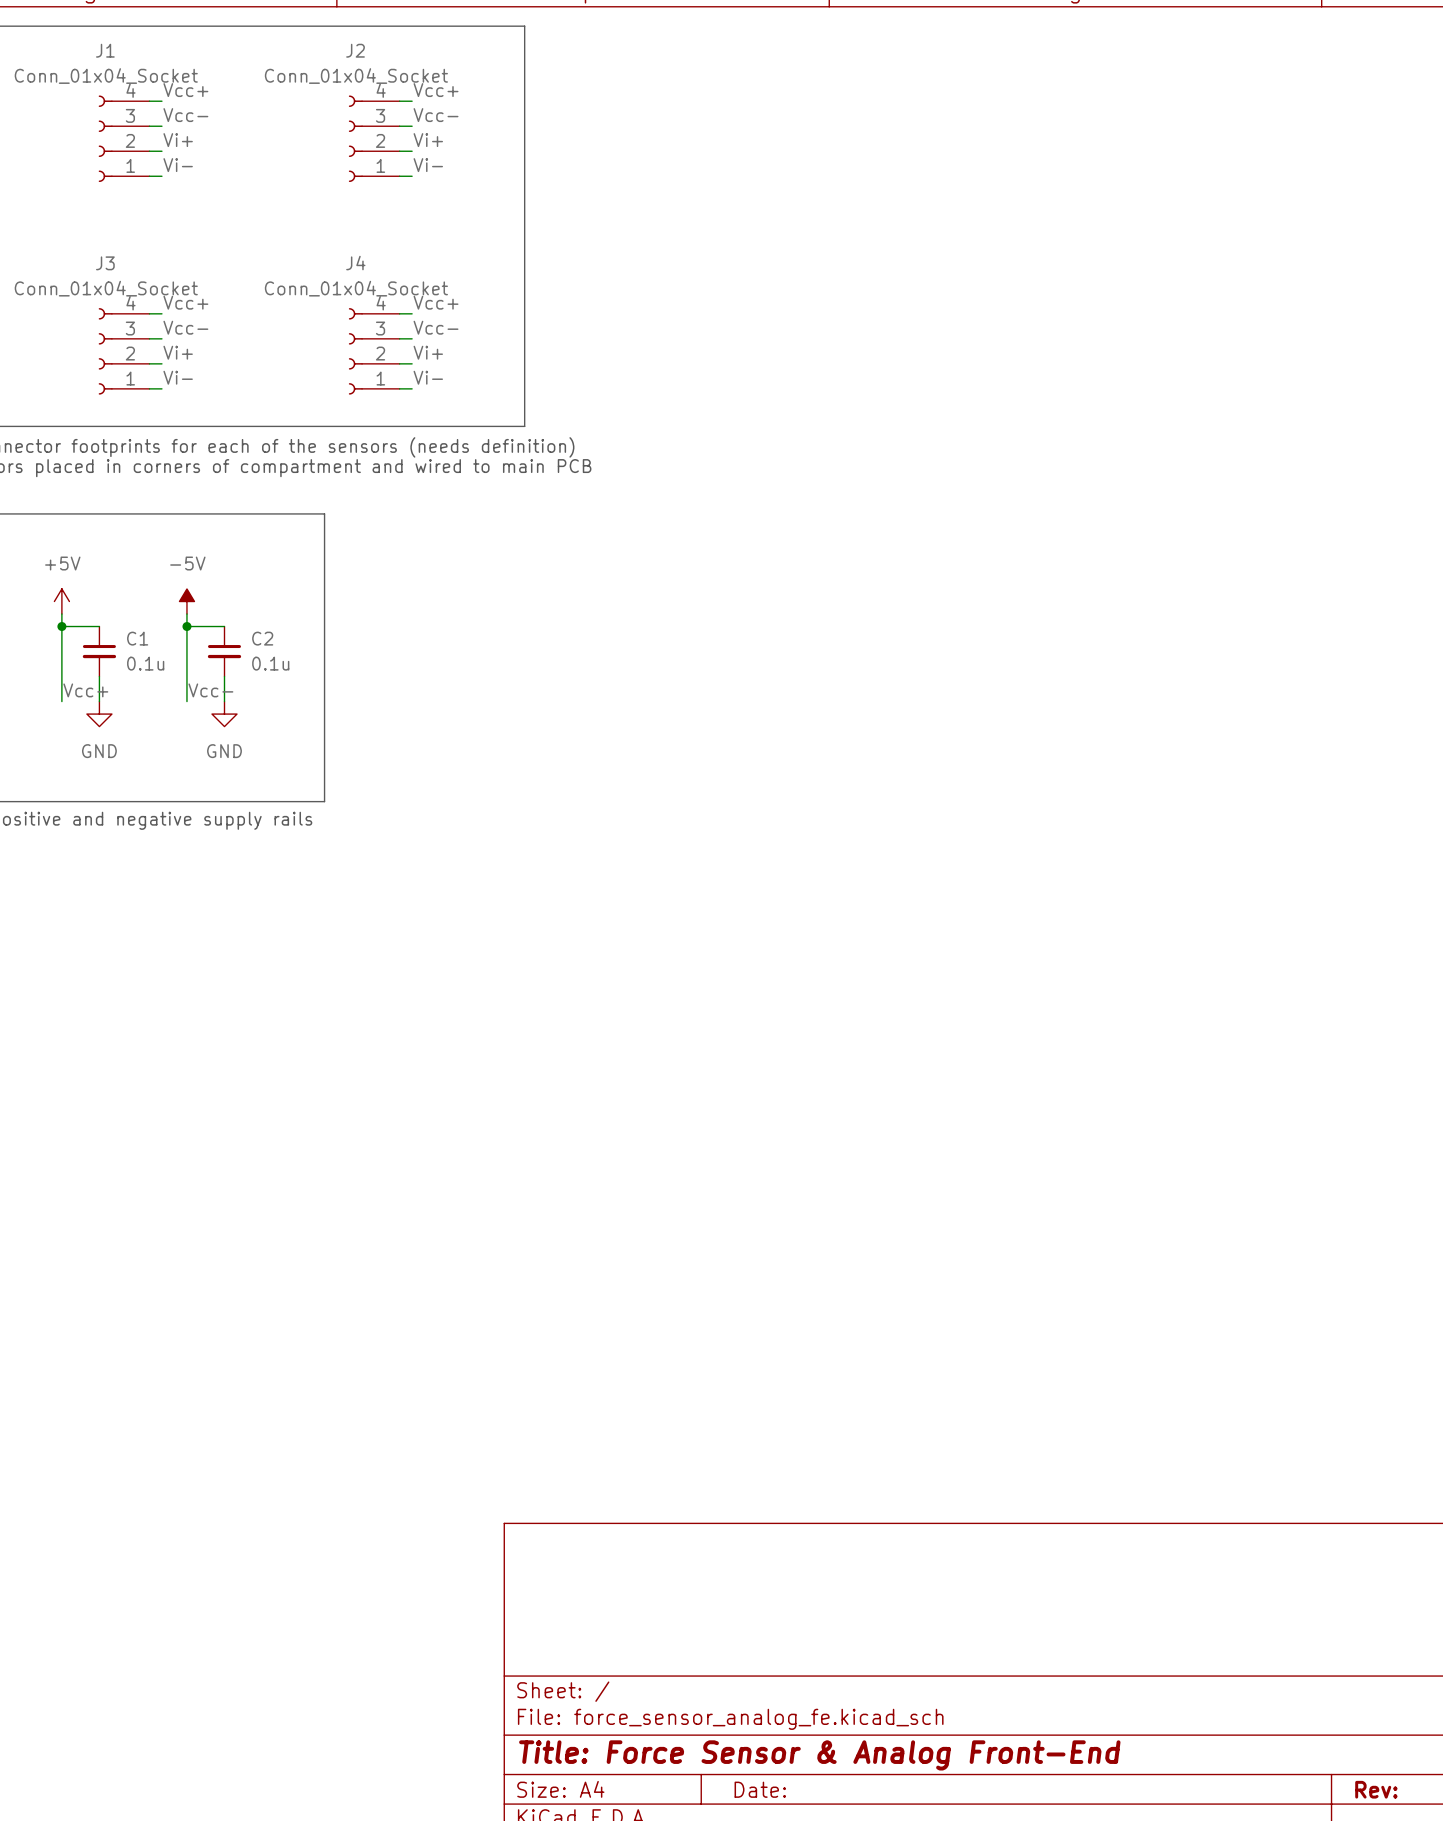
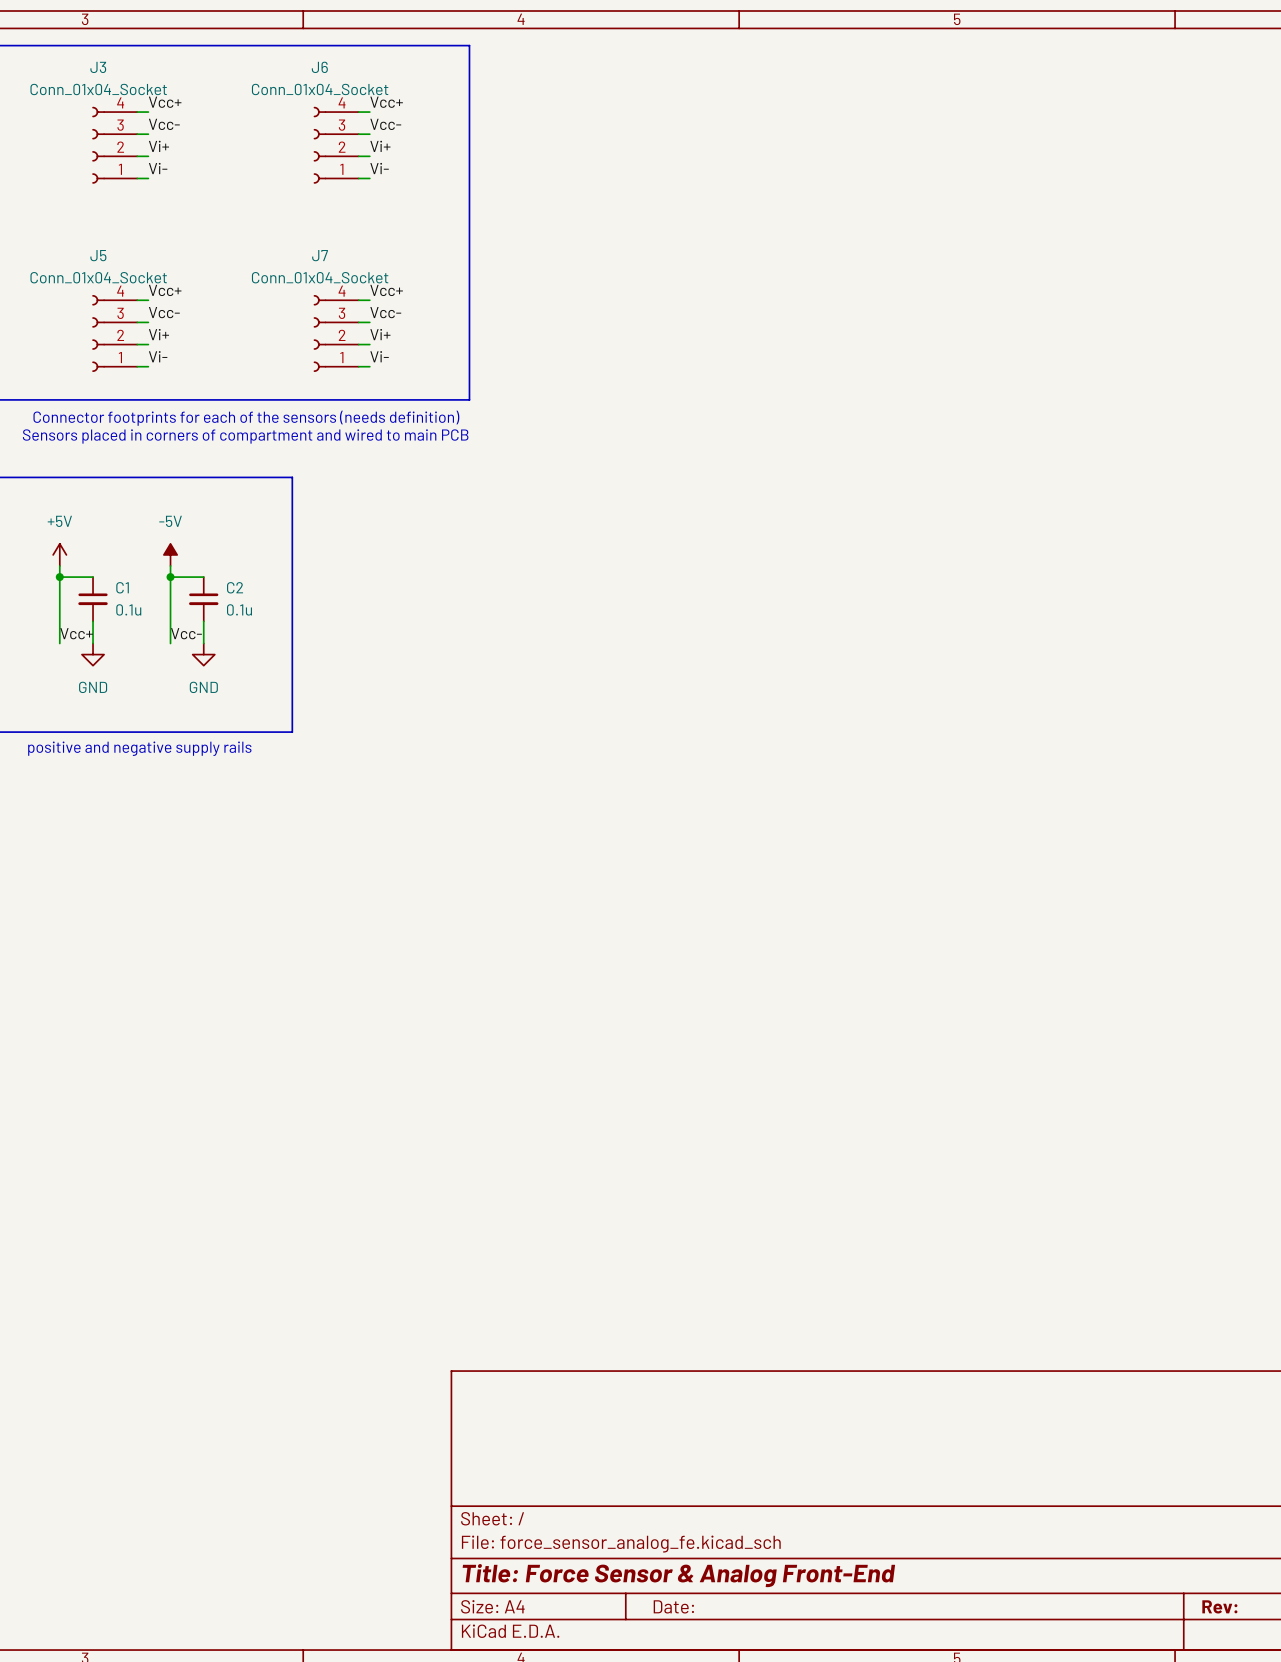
J1 name: J1 (105, 50) -> J3 (98, 67)
J2 name: J2 (355, 50) -> J6 (319, 67)
J3 name: J3 (105, 263) -> J5 (98, 255)
J4 name: J4 (355, 263) -> J7 (320, 255)

